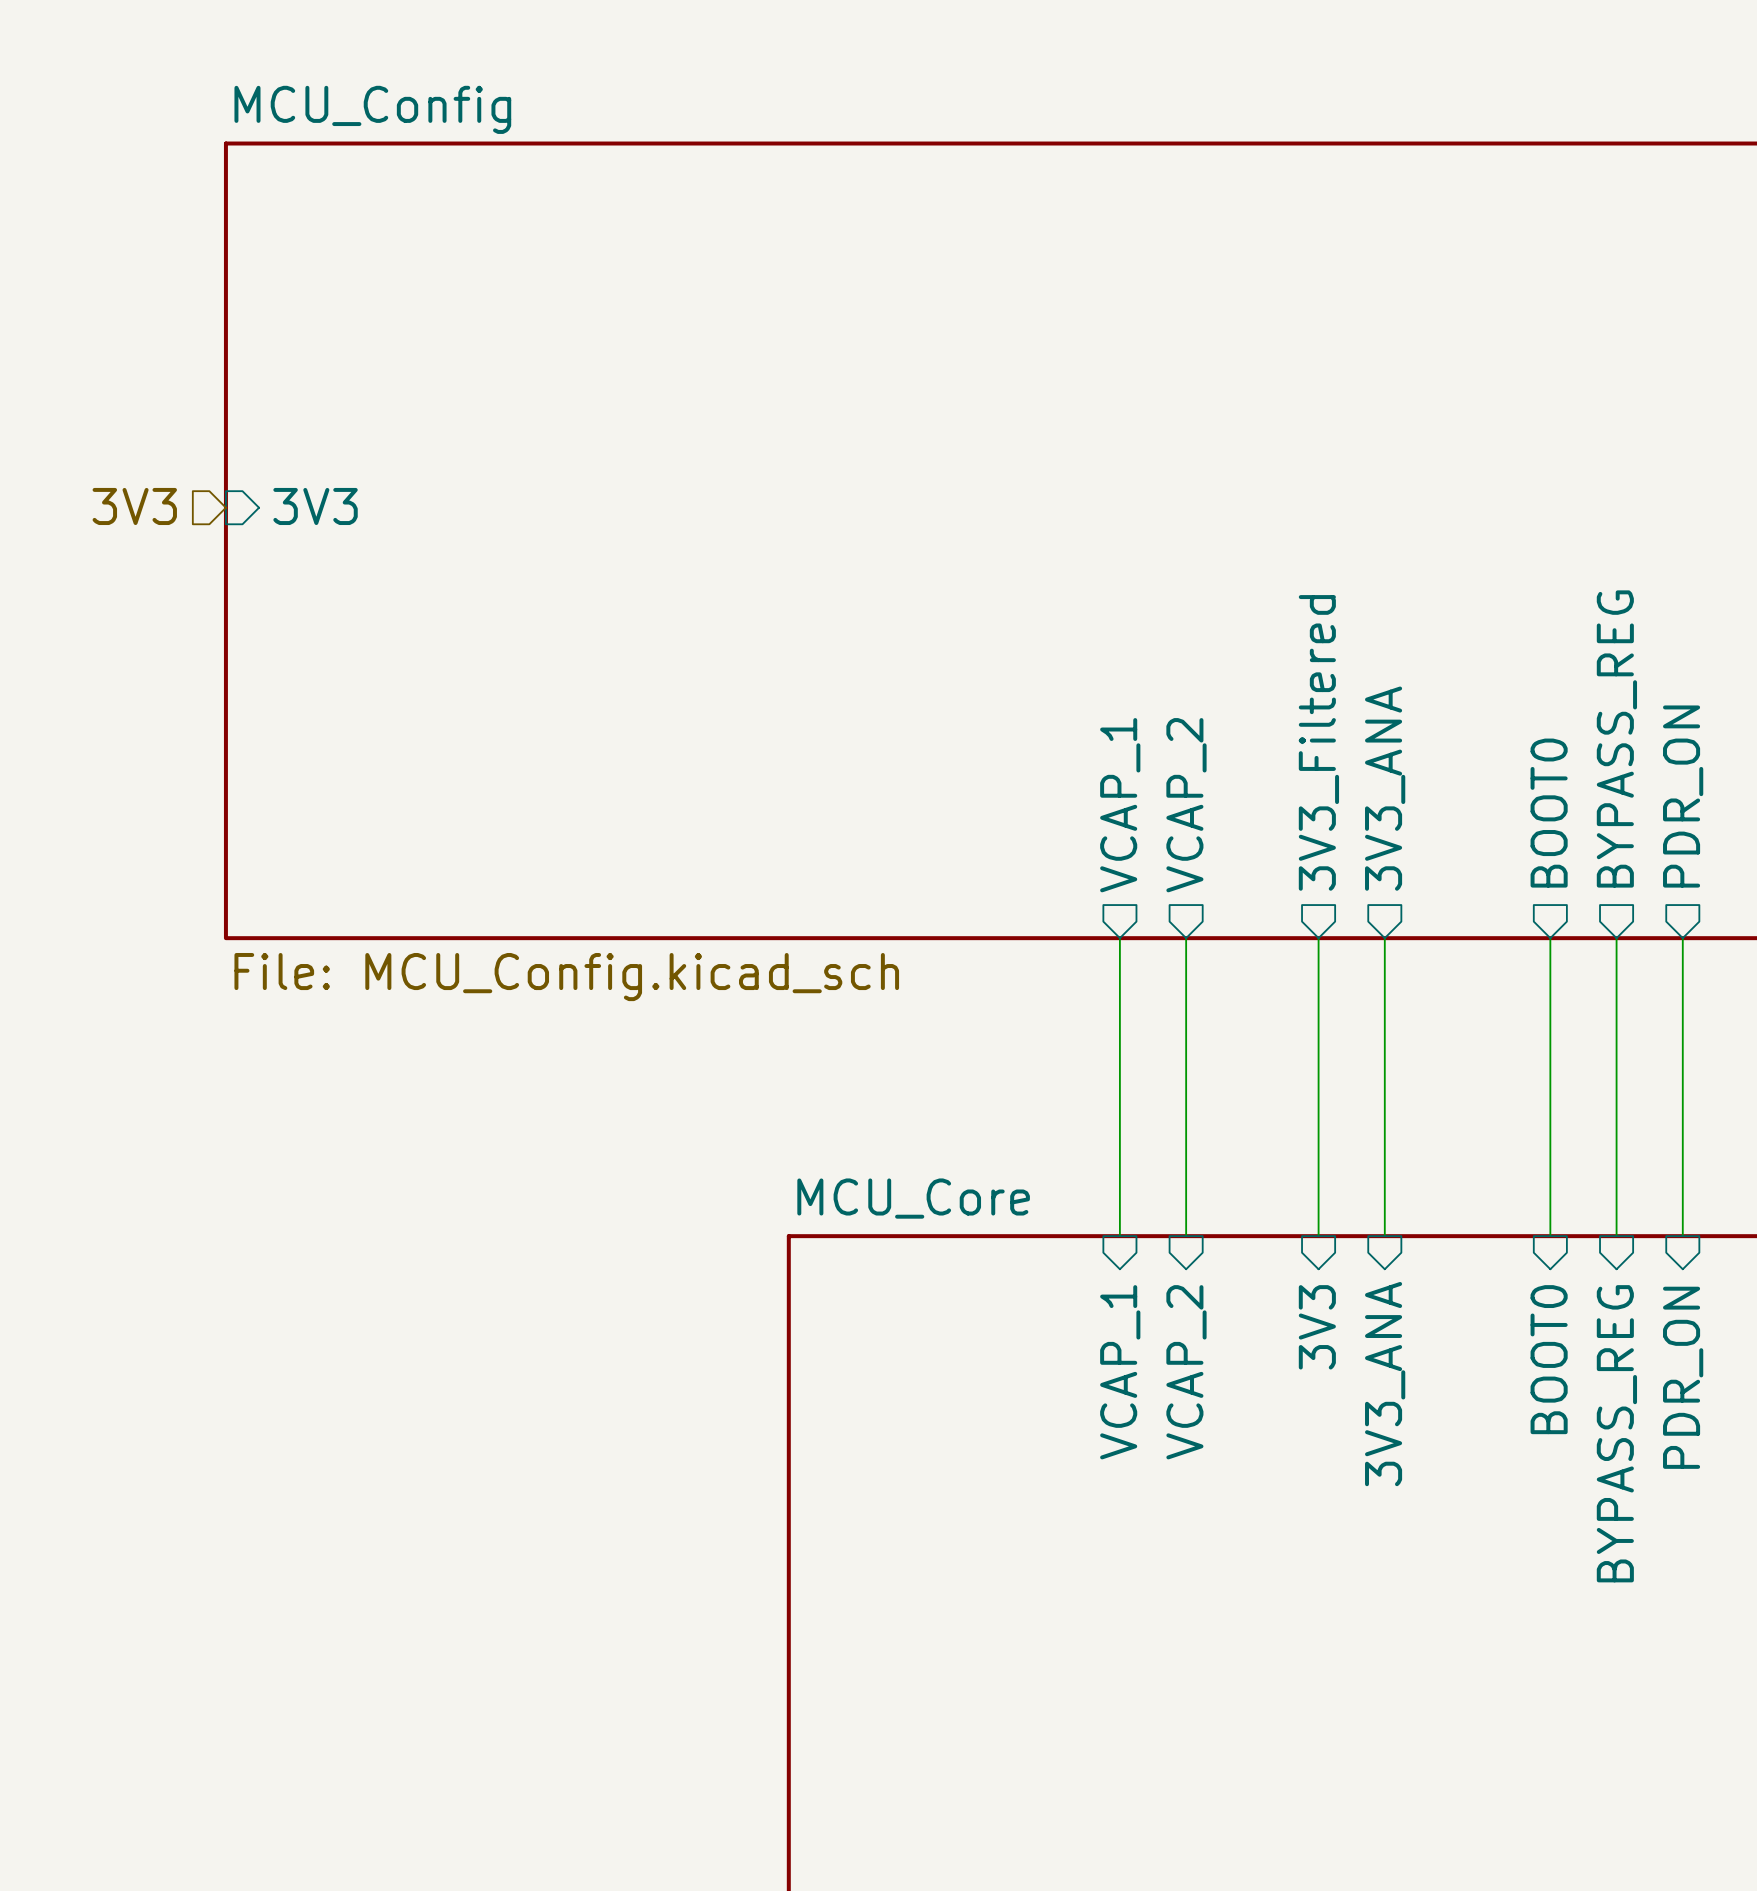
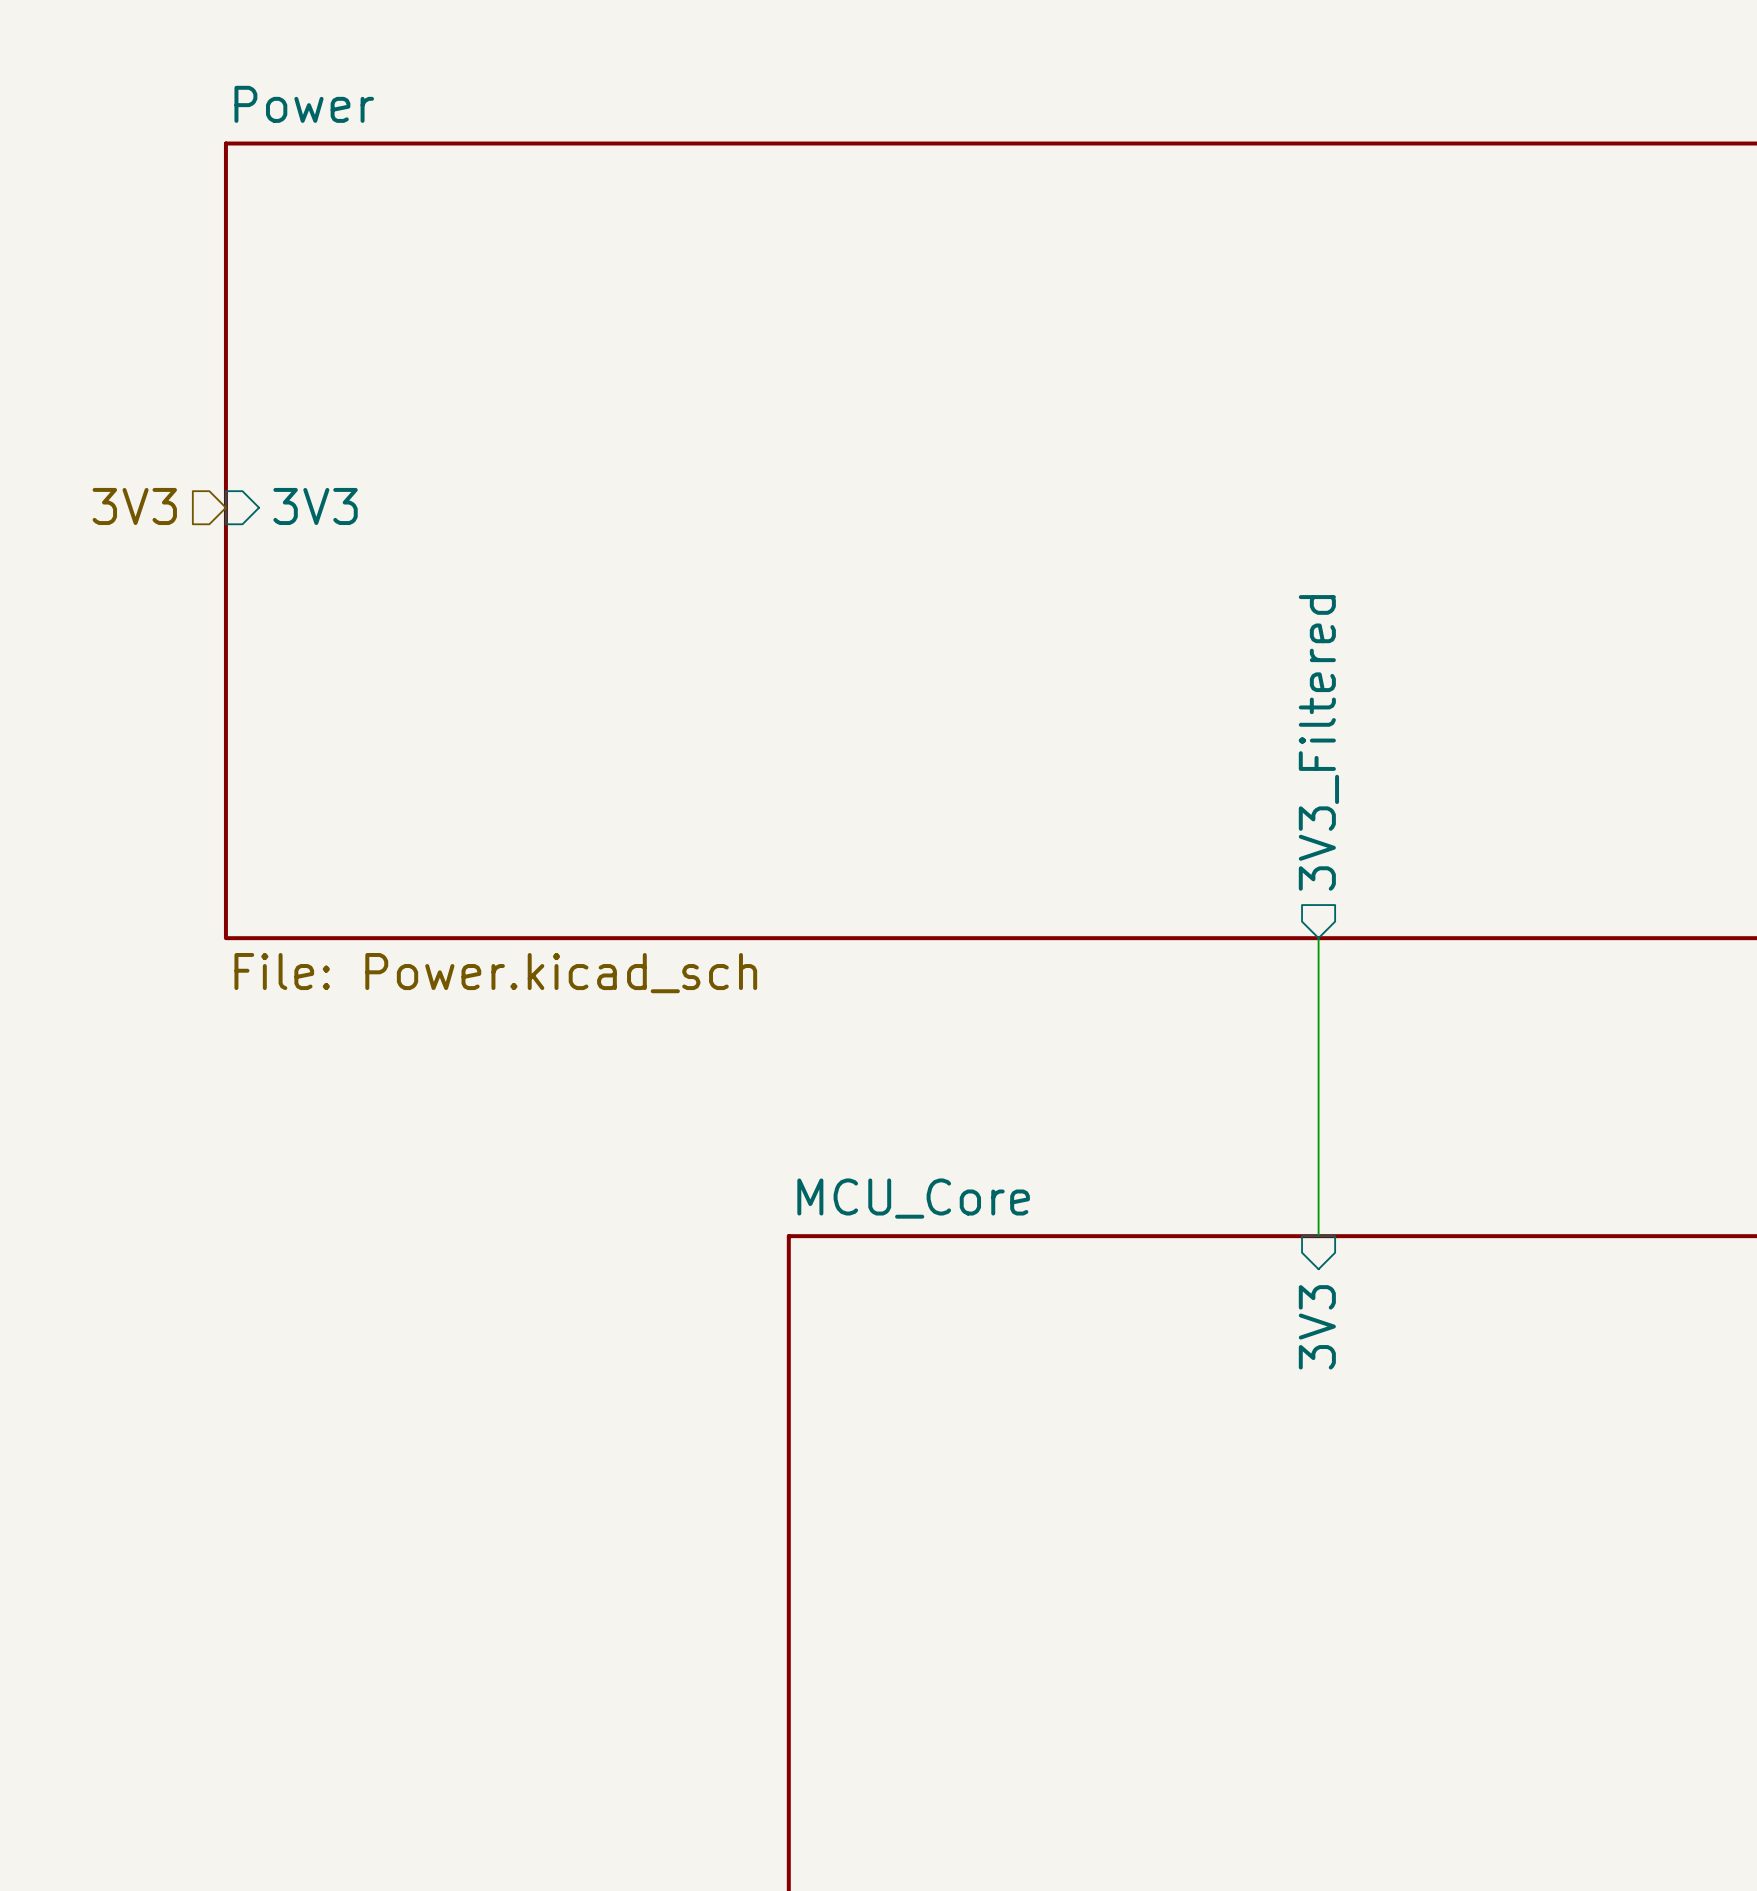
sheet MCU_Config name: MCU_Config (372, 109) -> Power (304, 104)
sheet pin: BYPASS_REG (1616, 738) -> none
sheet pin: 3V3_ANA (1385, 788) -> none
sheet pin: PDR_ON (1683, 796) -> none
sheet pin: VCAP_1 (1120, 805) -> none
sheet pin: VCAP_2 (1186, 805) -> none
sheet pin: BOOT0 (1549, 813) -> none
wire: (1119, 938) (1119, 1236) -> none
wire: (1186, 938) (1186, 1236) -> none
wire: (1384, 938) (1384, 1236) -> none
wire: (1550, 938) (1550, 1236) -> none
wire: (1616, 938) (1616, 1236) -> none
wire: (1682, 938) (1682, 1236) -> none
sheet MCU_Config value: File: MCU_Config.kicad_sch (566, 977) -> File: Power.kicad_sch (495, 973)
sheet pin: BOOT0 (1549, 1359) -> none
sheet pin: VCAP_1 (1120, 1372) -> none
sheet pin: VCAP_2 (1186, 1372) -> none
sheet pin: PDR_ON (1683, 1377) -> none
sheet pin: 3V3_ANA (1385, 1384) -> none
sheet pin: BYPASS_REG (1616, 1433) -> none

